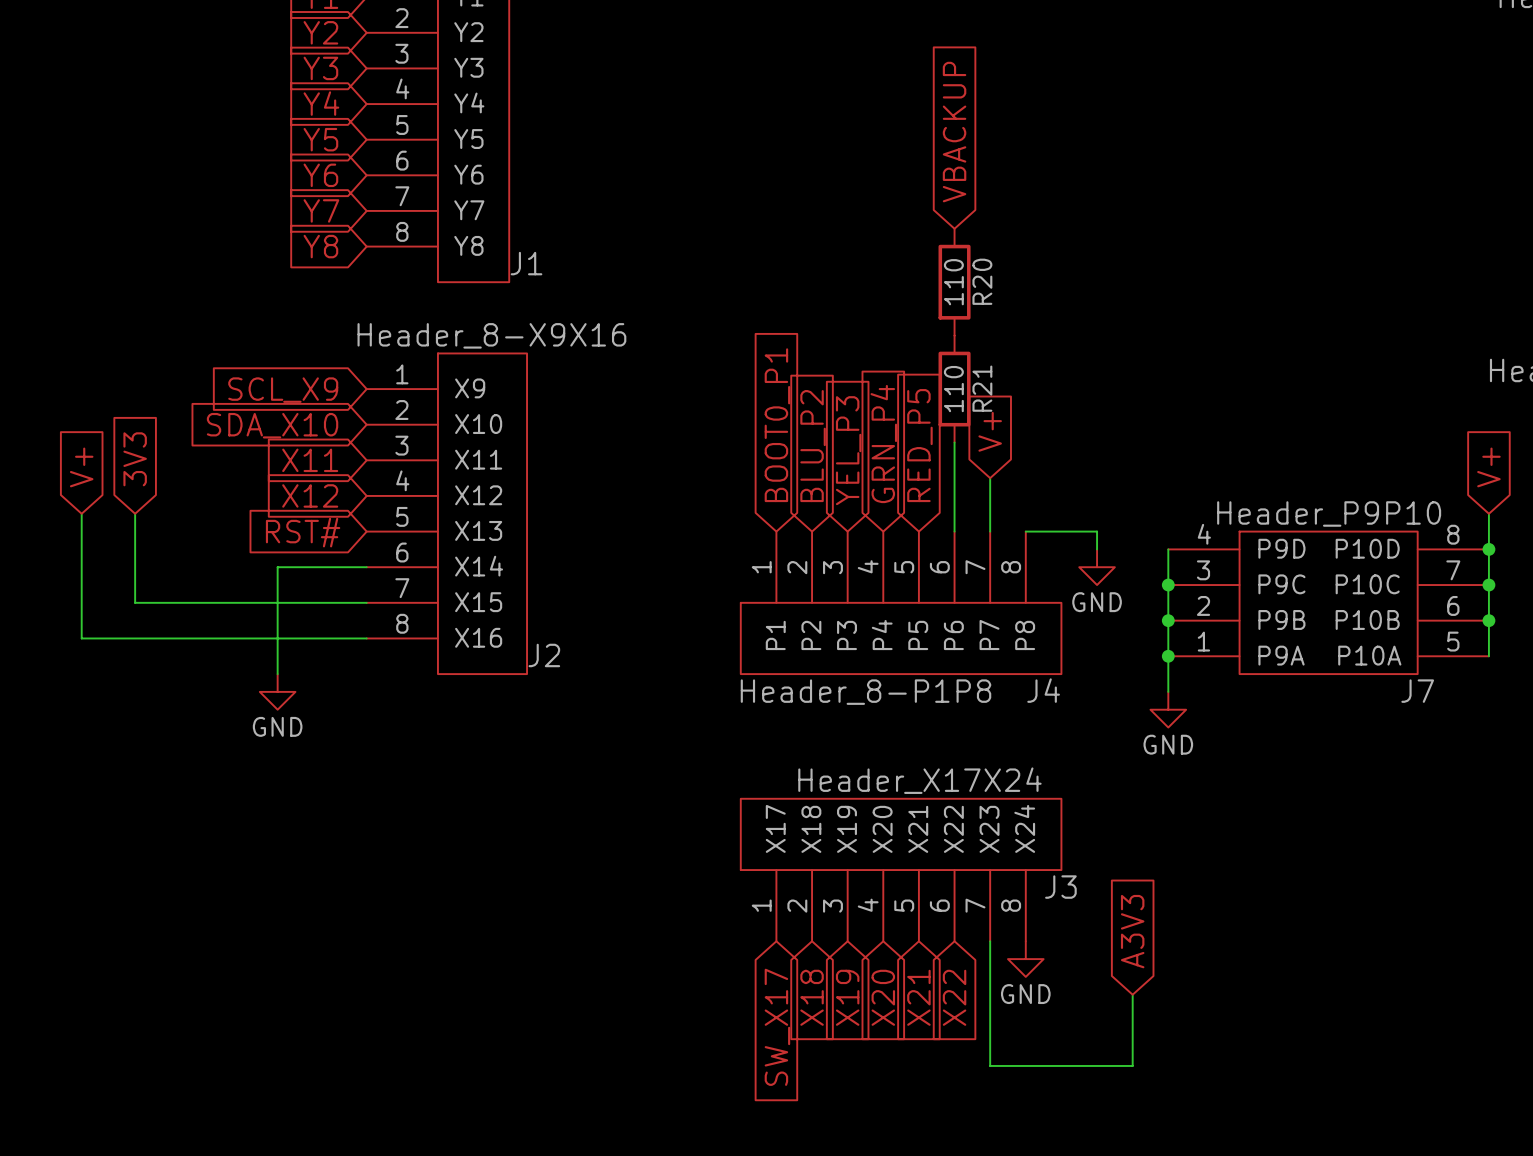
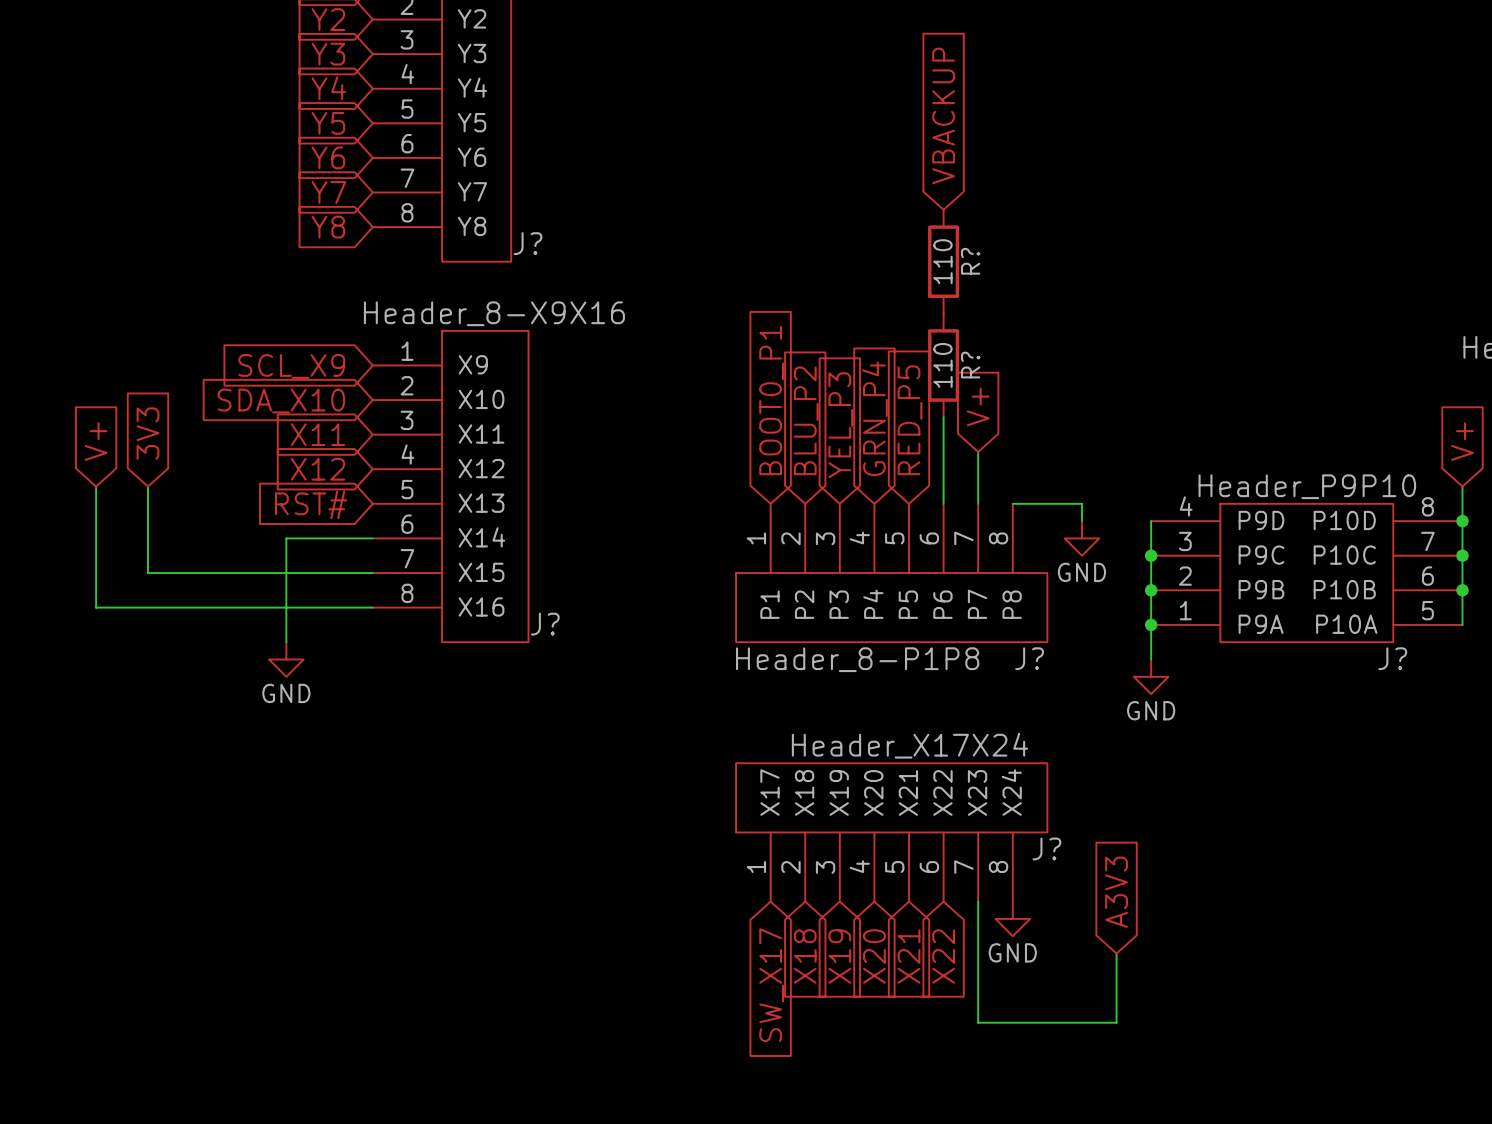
J1 name: J1 (526, 263) -> J? (528, 243)
R20 name: R20 (982, 281) -> R? (970, 261)
R21 name: R21 (982, 388) -> R? (970, 365)
J2 name: J2 (544, 655) -> J? (545, 624)
J4 name: J4 (1043, 690) -> J? (1029, 658)
J7 name: J7 (1417, 691) -> J? (1392, 658)
J3 name: J3 (1060, 887) -> J? (1046, 848)

